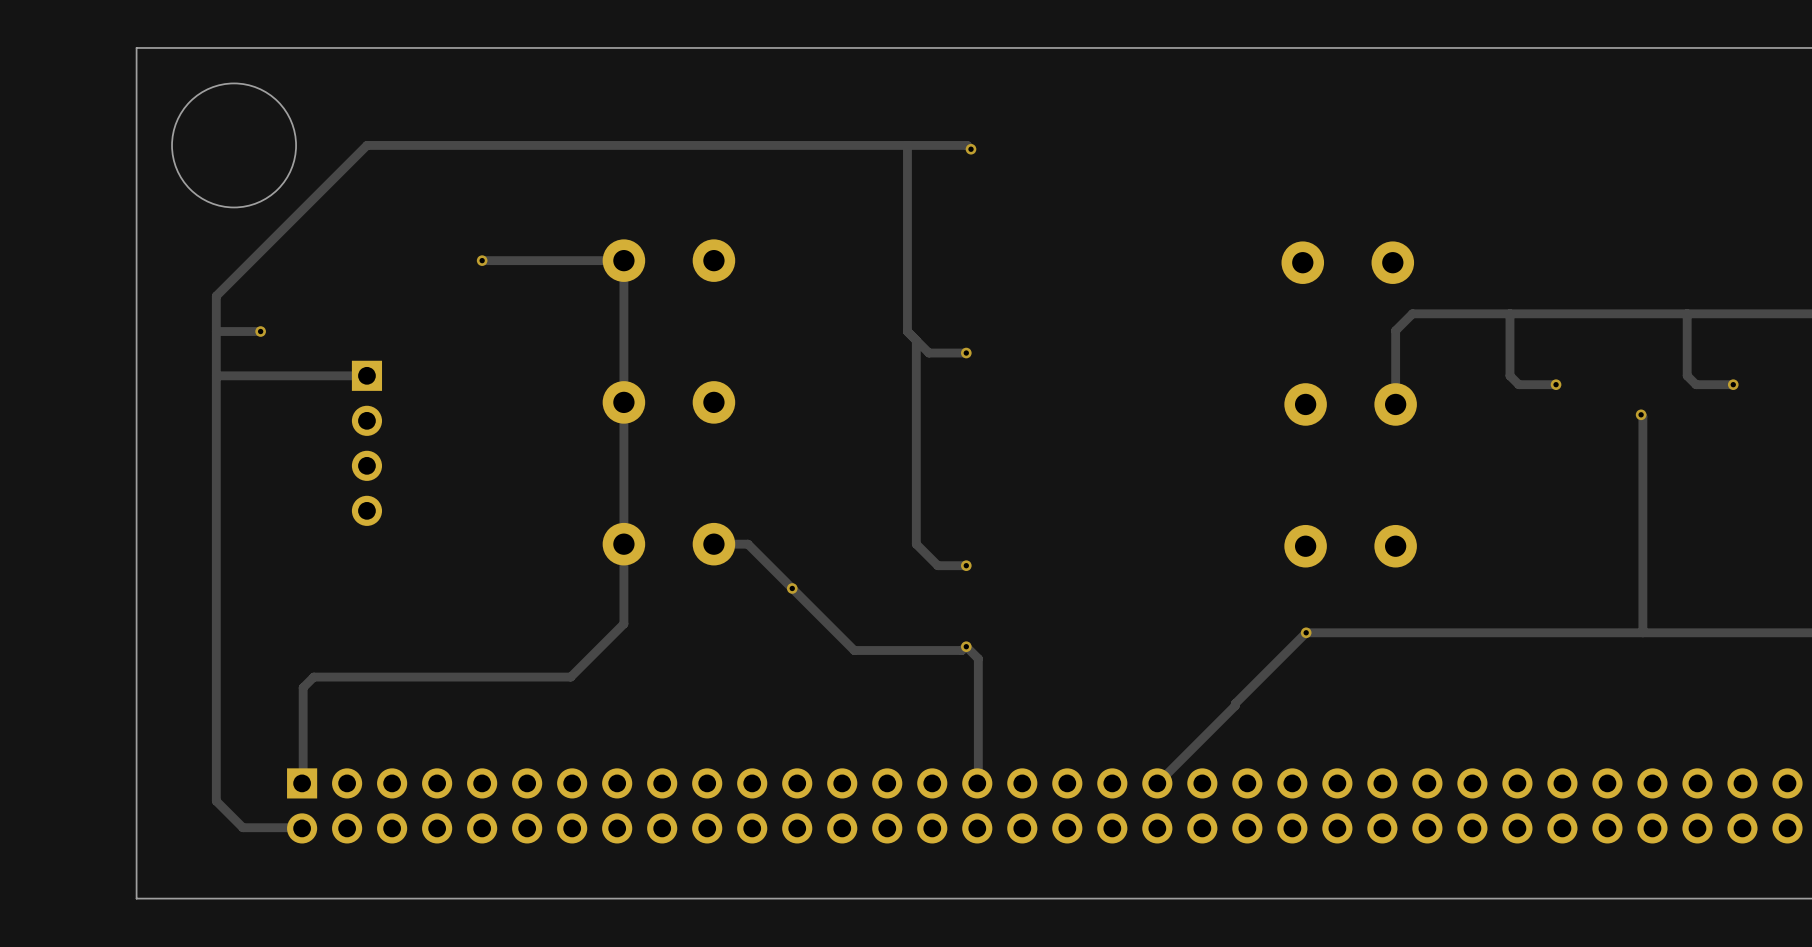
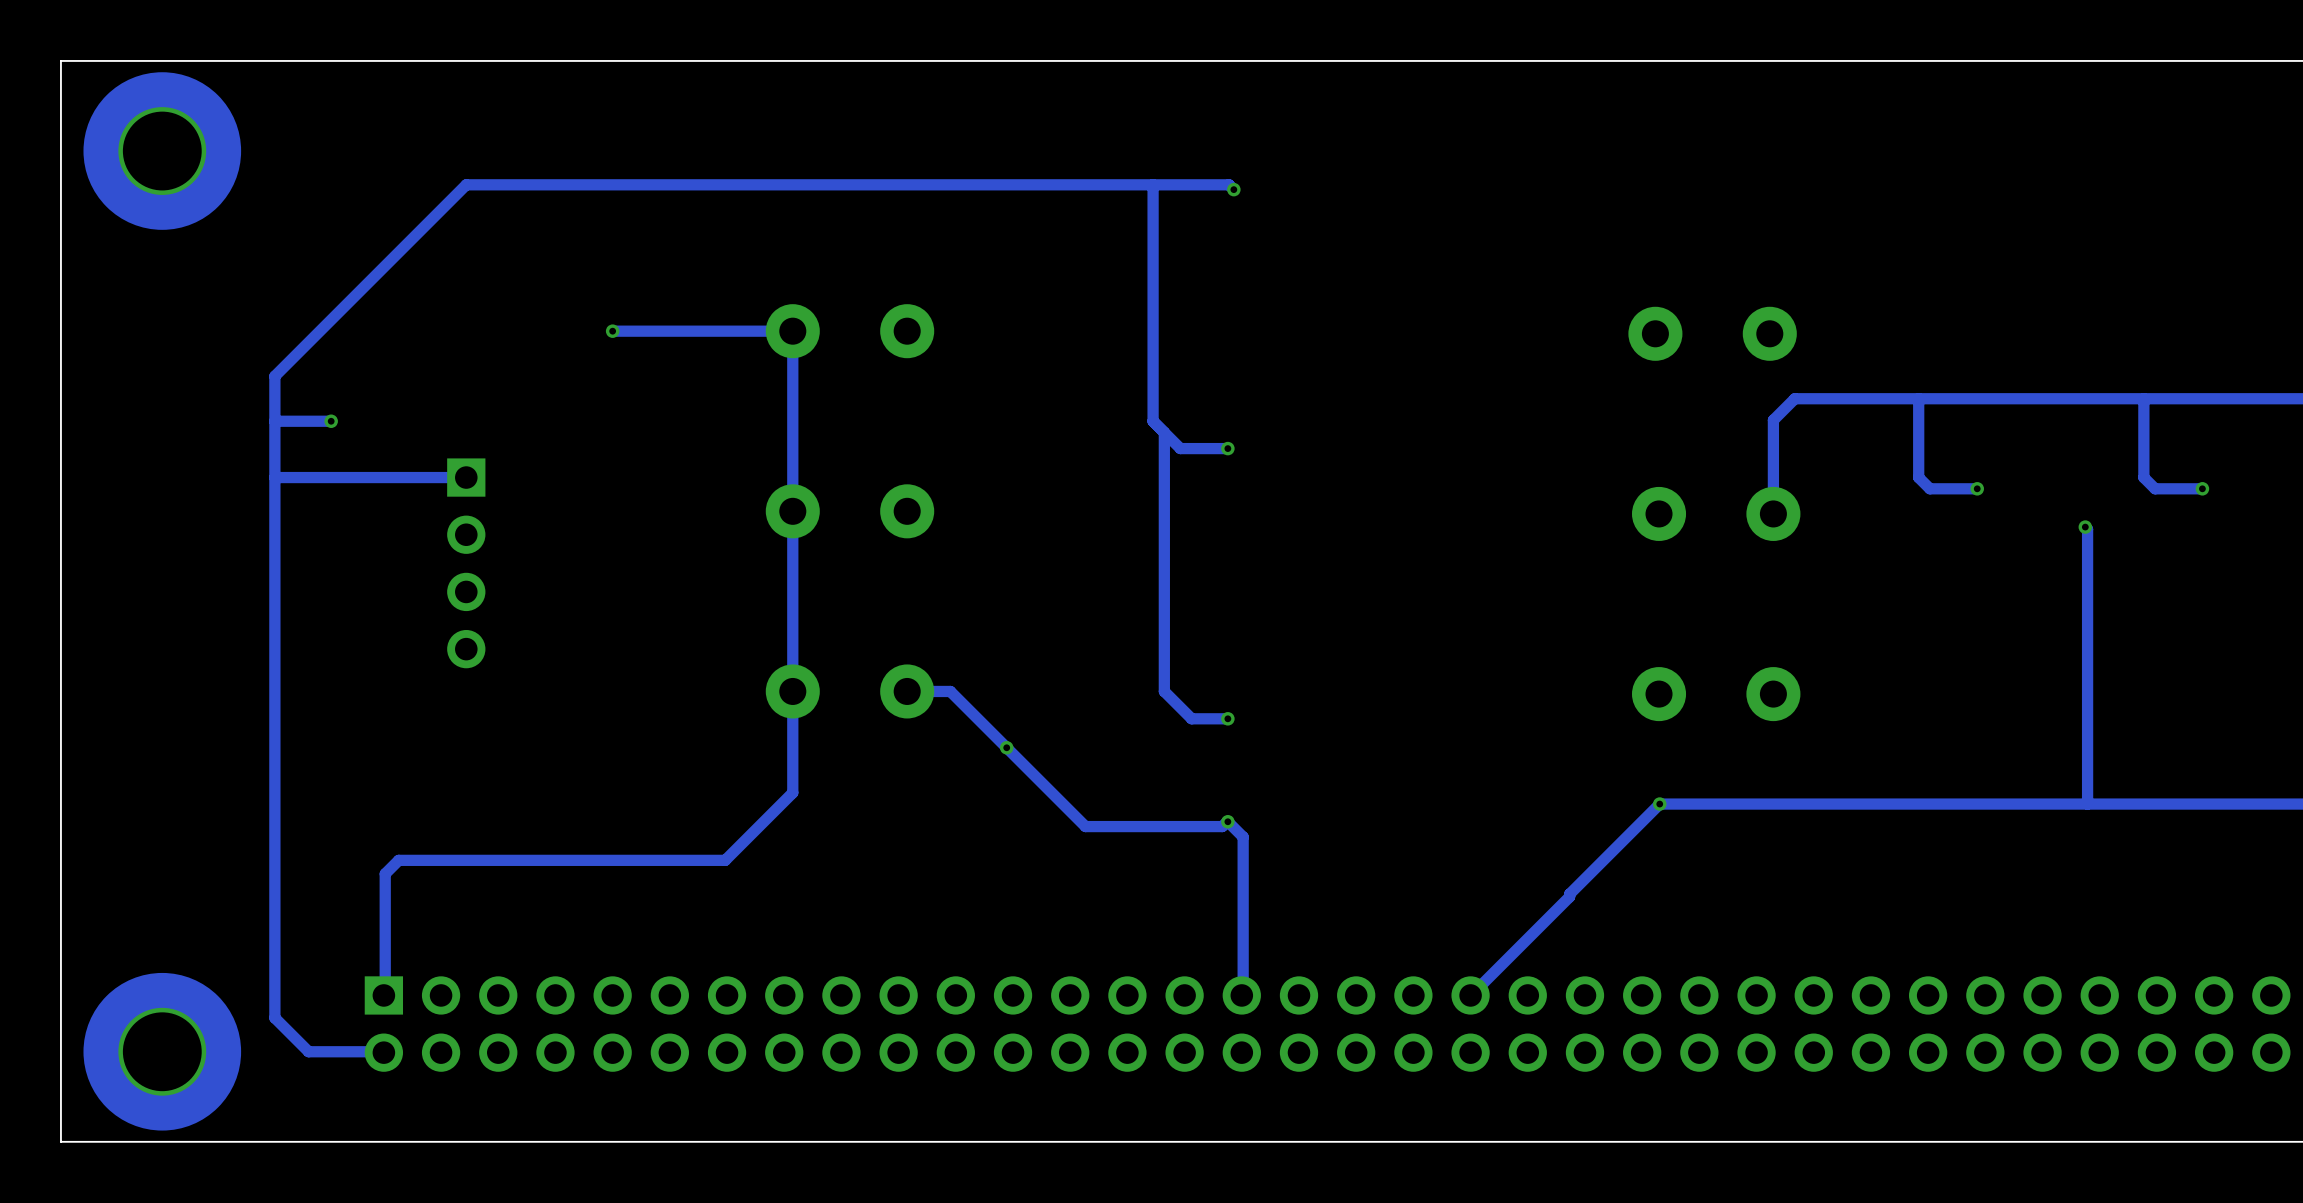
board edge: (136, 47) (136, 898) -> (173, 60) (60, 60) (60, 1141) (173, 1141)
round board edge: [171, 82, 297, 208] -> none
part: none -> (162, 151)
part: none -> (162, 1051)

